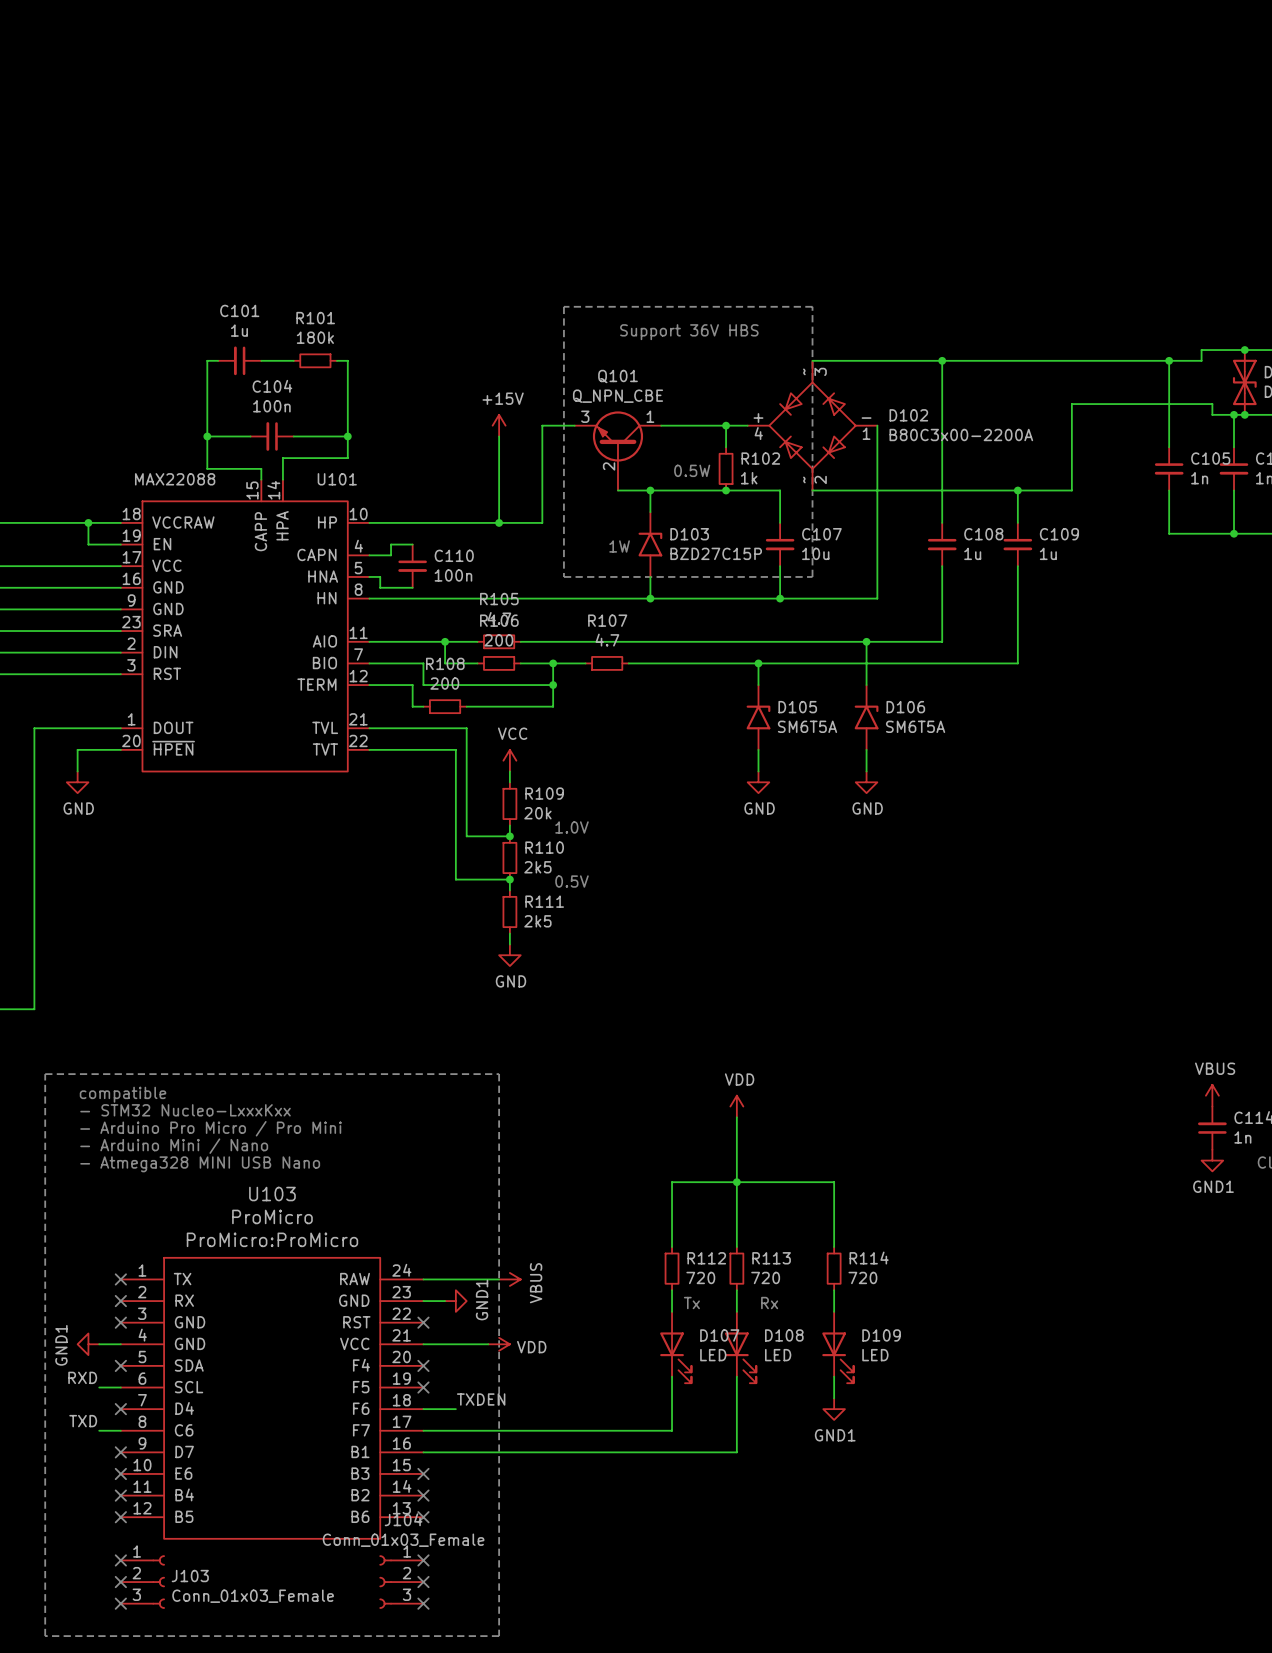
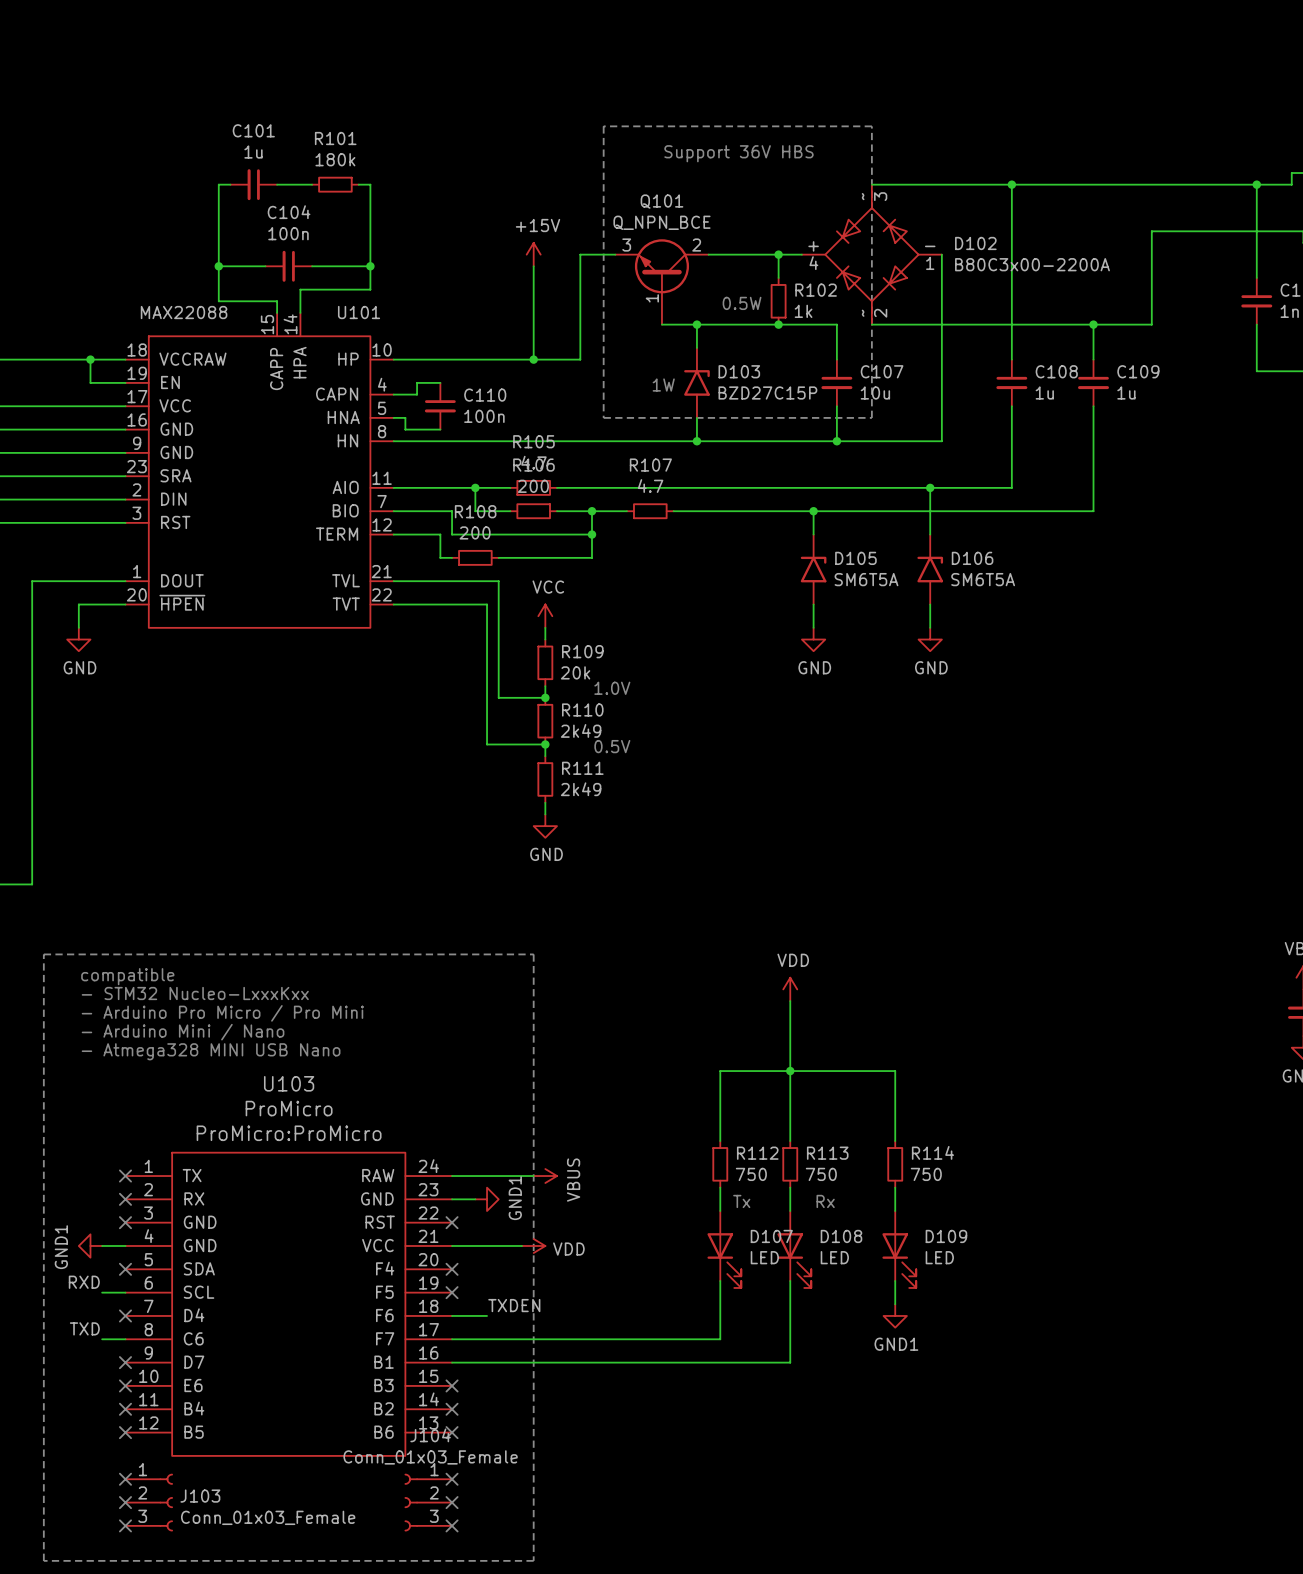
Q101 value: Q_NPN_CBE (617, 396) -> Q_NPN_BCE (661, 222)
Q101 pin number: 1 (650, 416) -> 2 (696, 245)
Q101 pin number: 2 (609, 466) -> 1 (652, 298)
R110 value: 2k5 (537, 867) -> 2k49 (581, 730)
R111 value: 2k5 (537, 921) -> 2k49 (581, 789)
R112 value: 720 (700, 1277) -> 750 (751, 1174)
R113 value: 720 (765, 1277) -> 750 (821, 1174)
R114 value: 720 (862, 1277) -> 750 (926, 1174)

